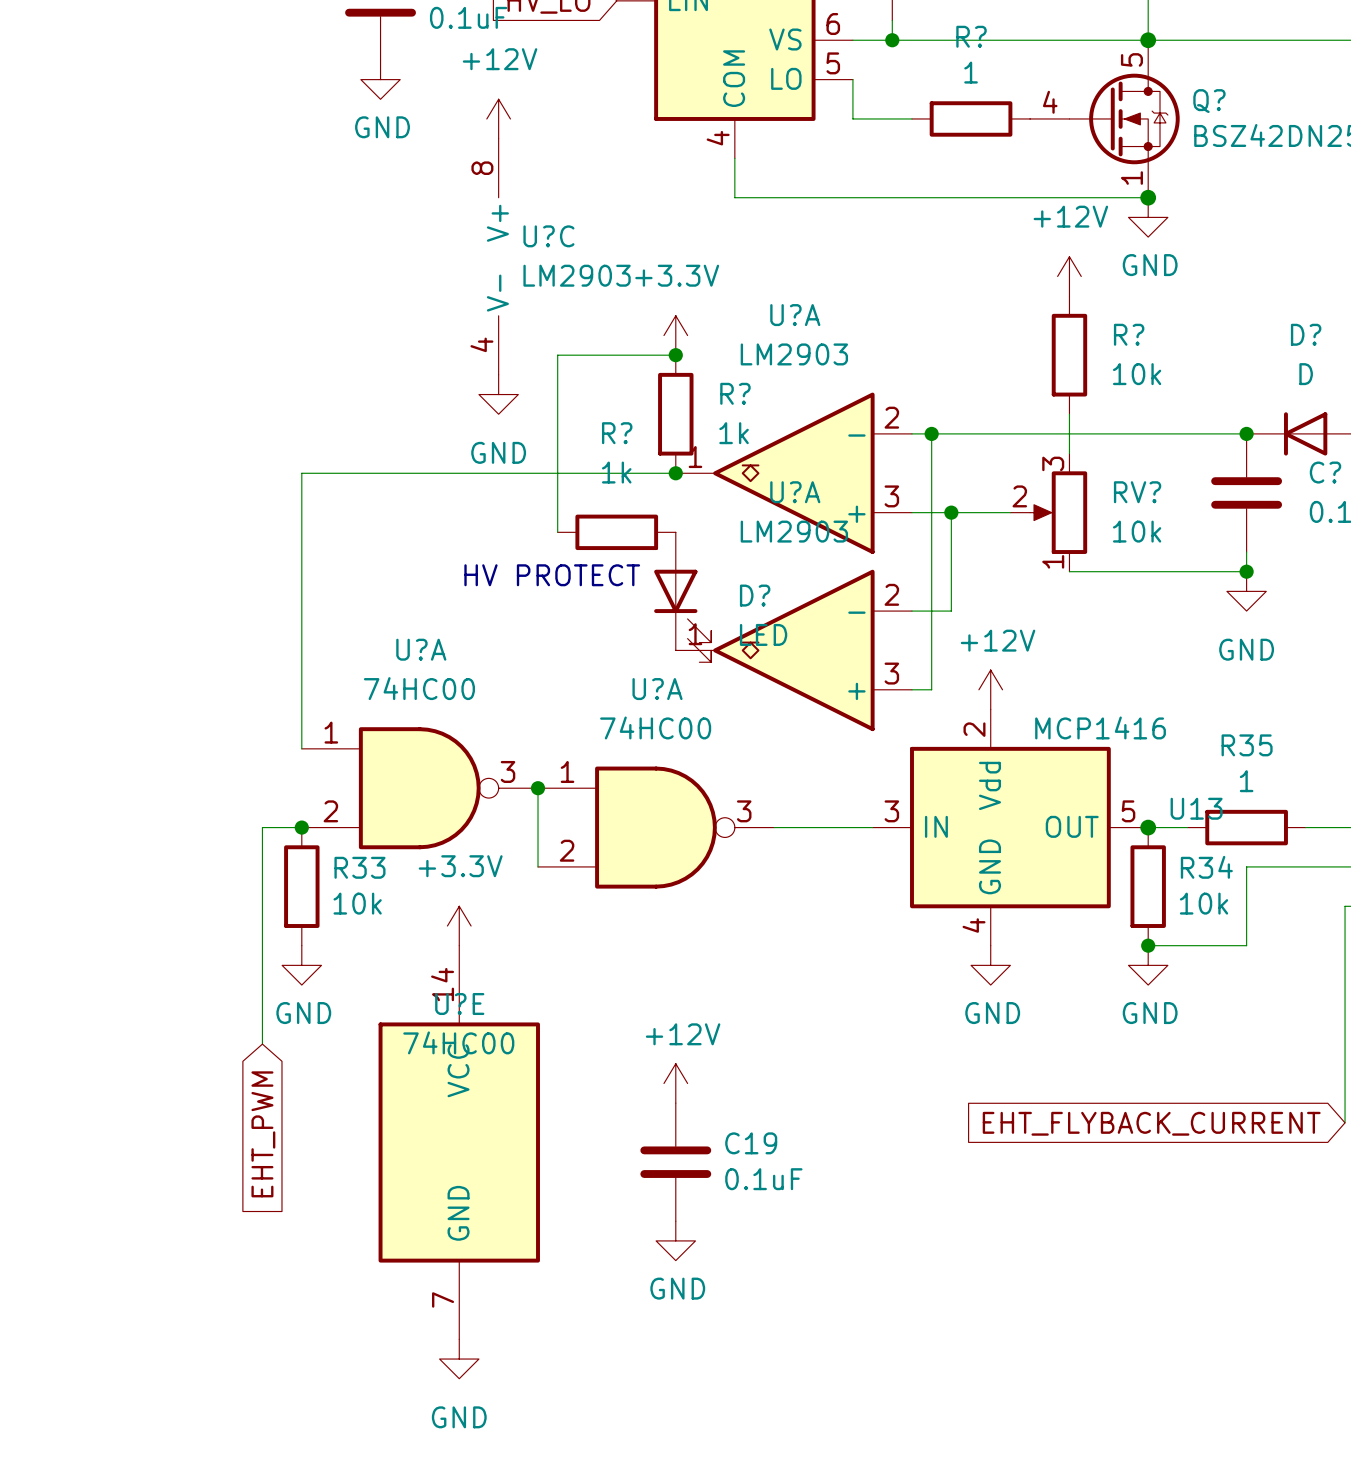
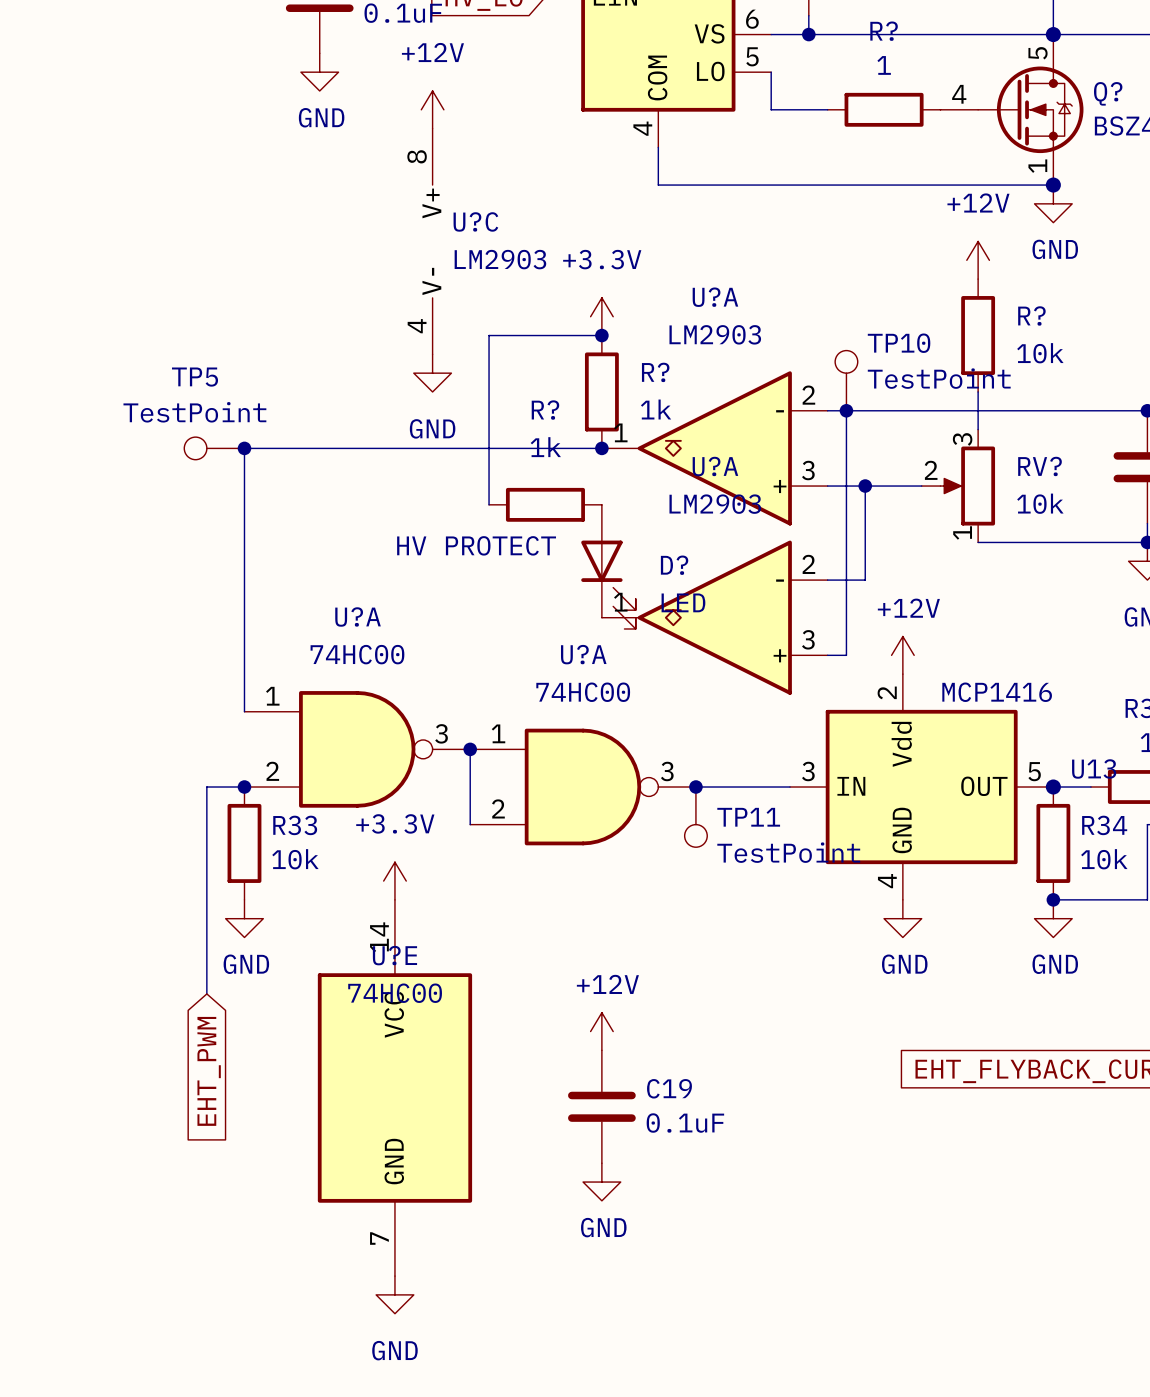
TP10: none -> TestPoint (846, 380)
TP5: none -> TestPoint (214, 448)
junction: none -> (244, 448)
junction: none -> (695, 787)
TP11: none -> TestPoint (695, 817)

